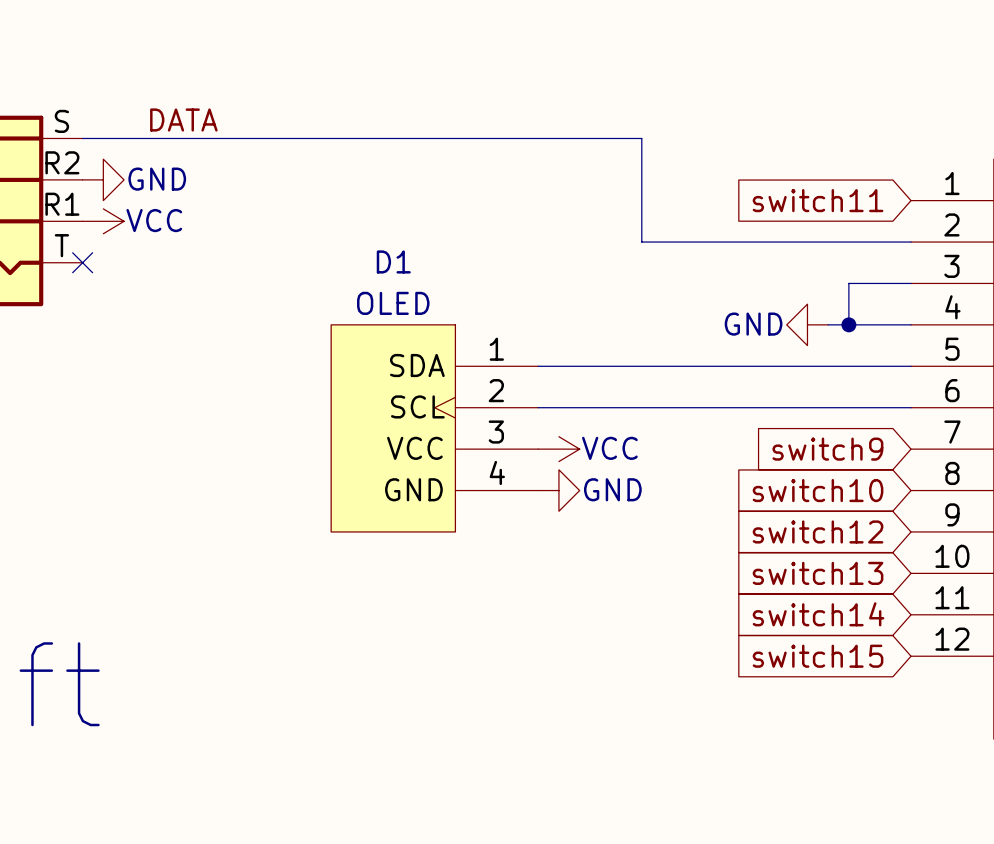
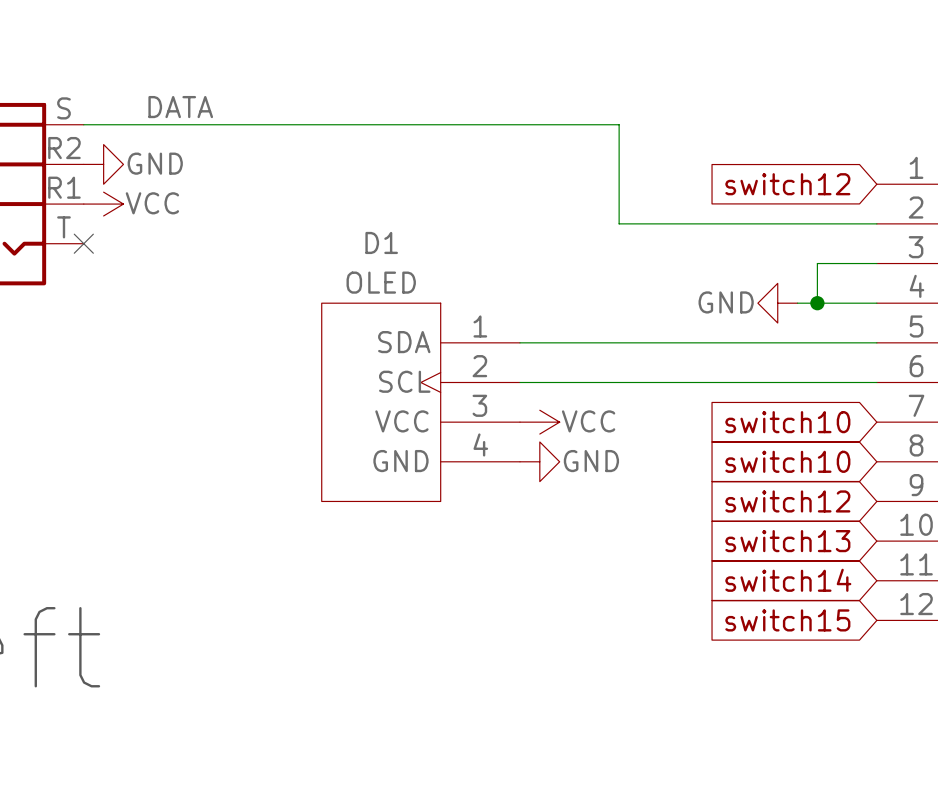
global label: switch11 (818, 200) -> switch12 (787, 184)
global label: switch9 (827, 449) -> switch10 (787, 422)

